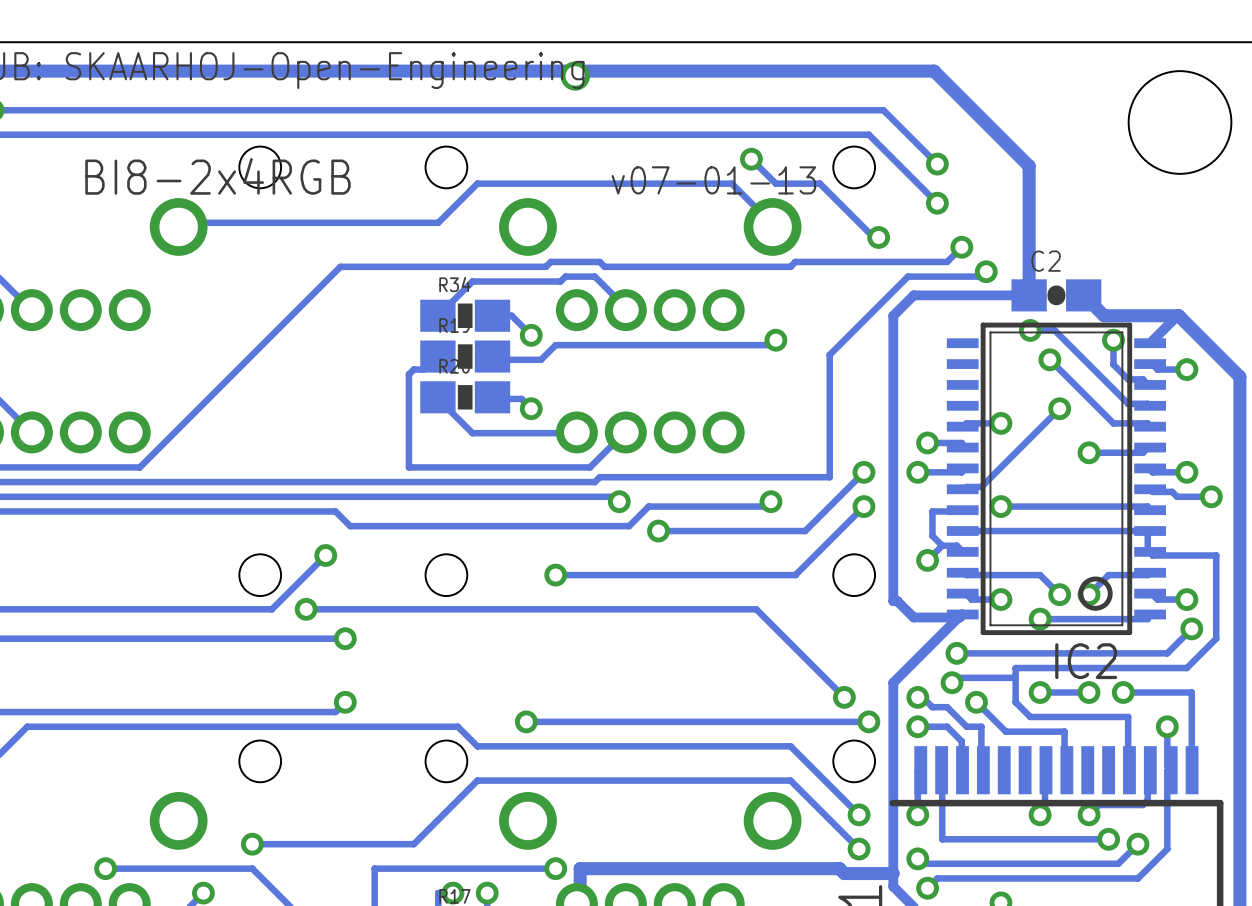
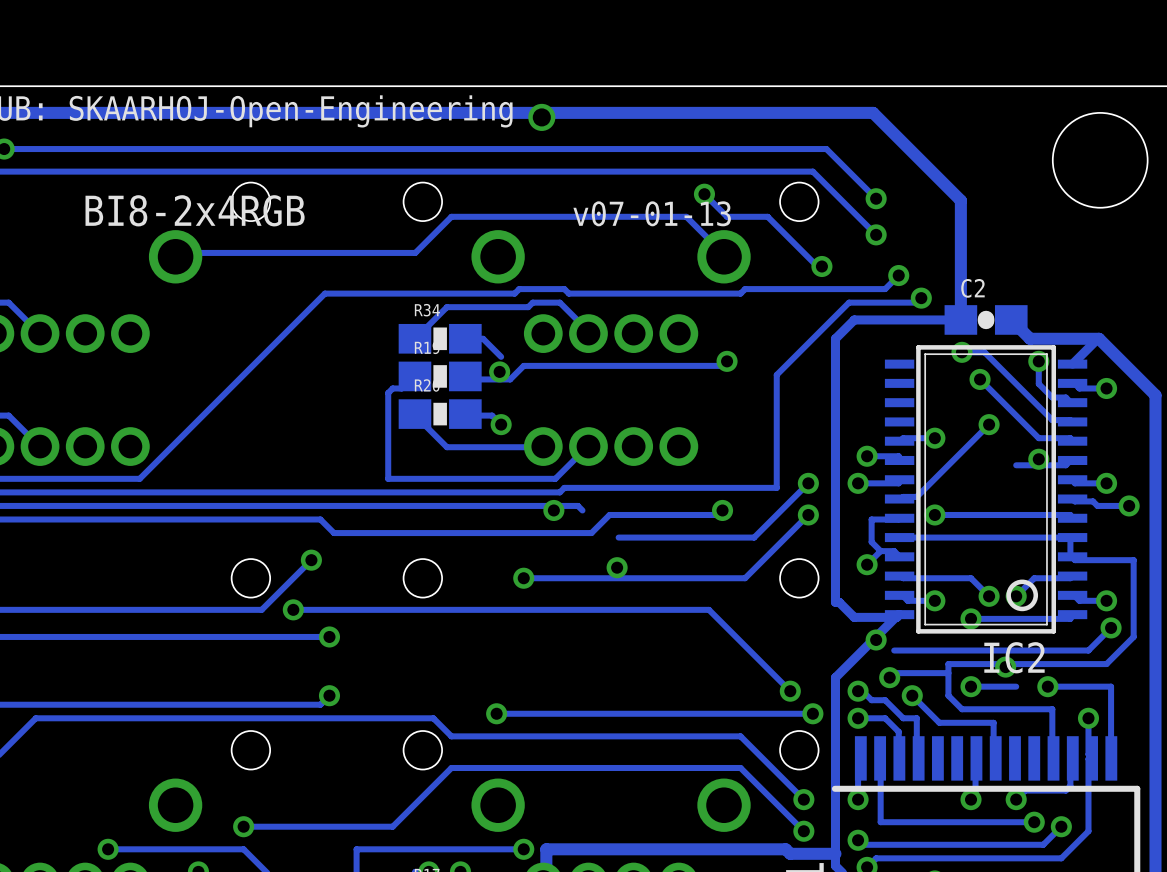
via position: (531, 335) -> (499, 371)
via position: (1089, 452) -> (1038, 459)
via position: (619, 501) -> (553, 510)
via position: (658, 531) -> (617, 567)
via position: (956, 653) -> (876, 639)
via position: (1089, 692) -> (1005, 667)

